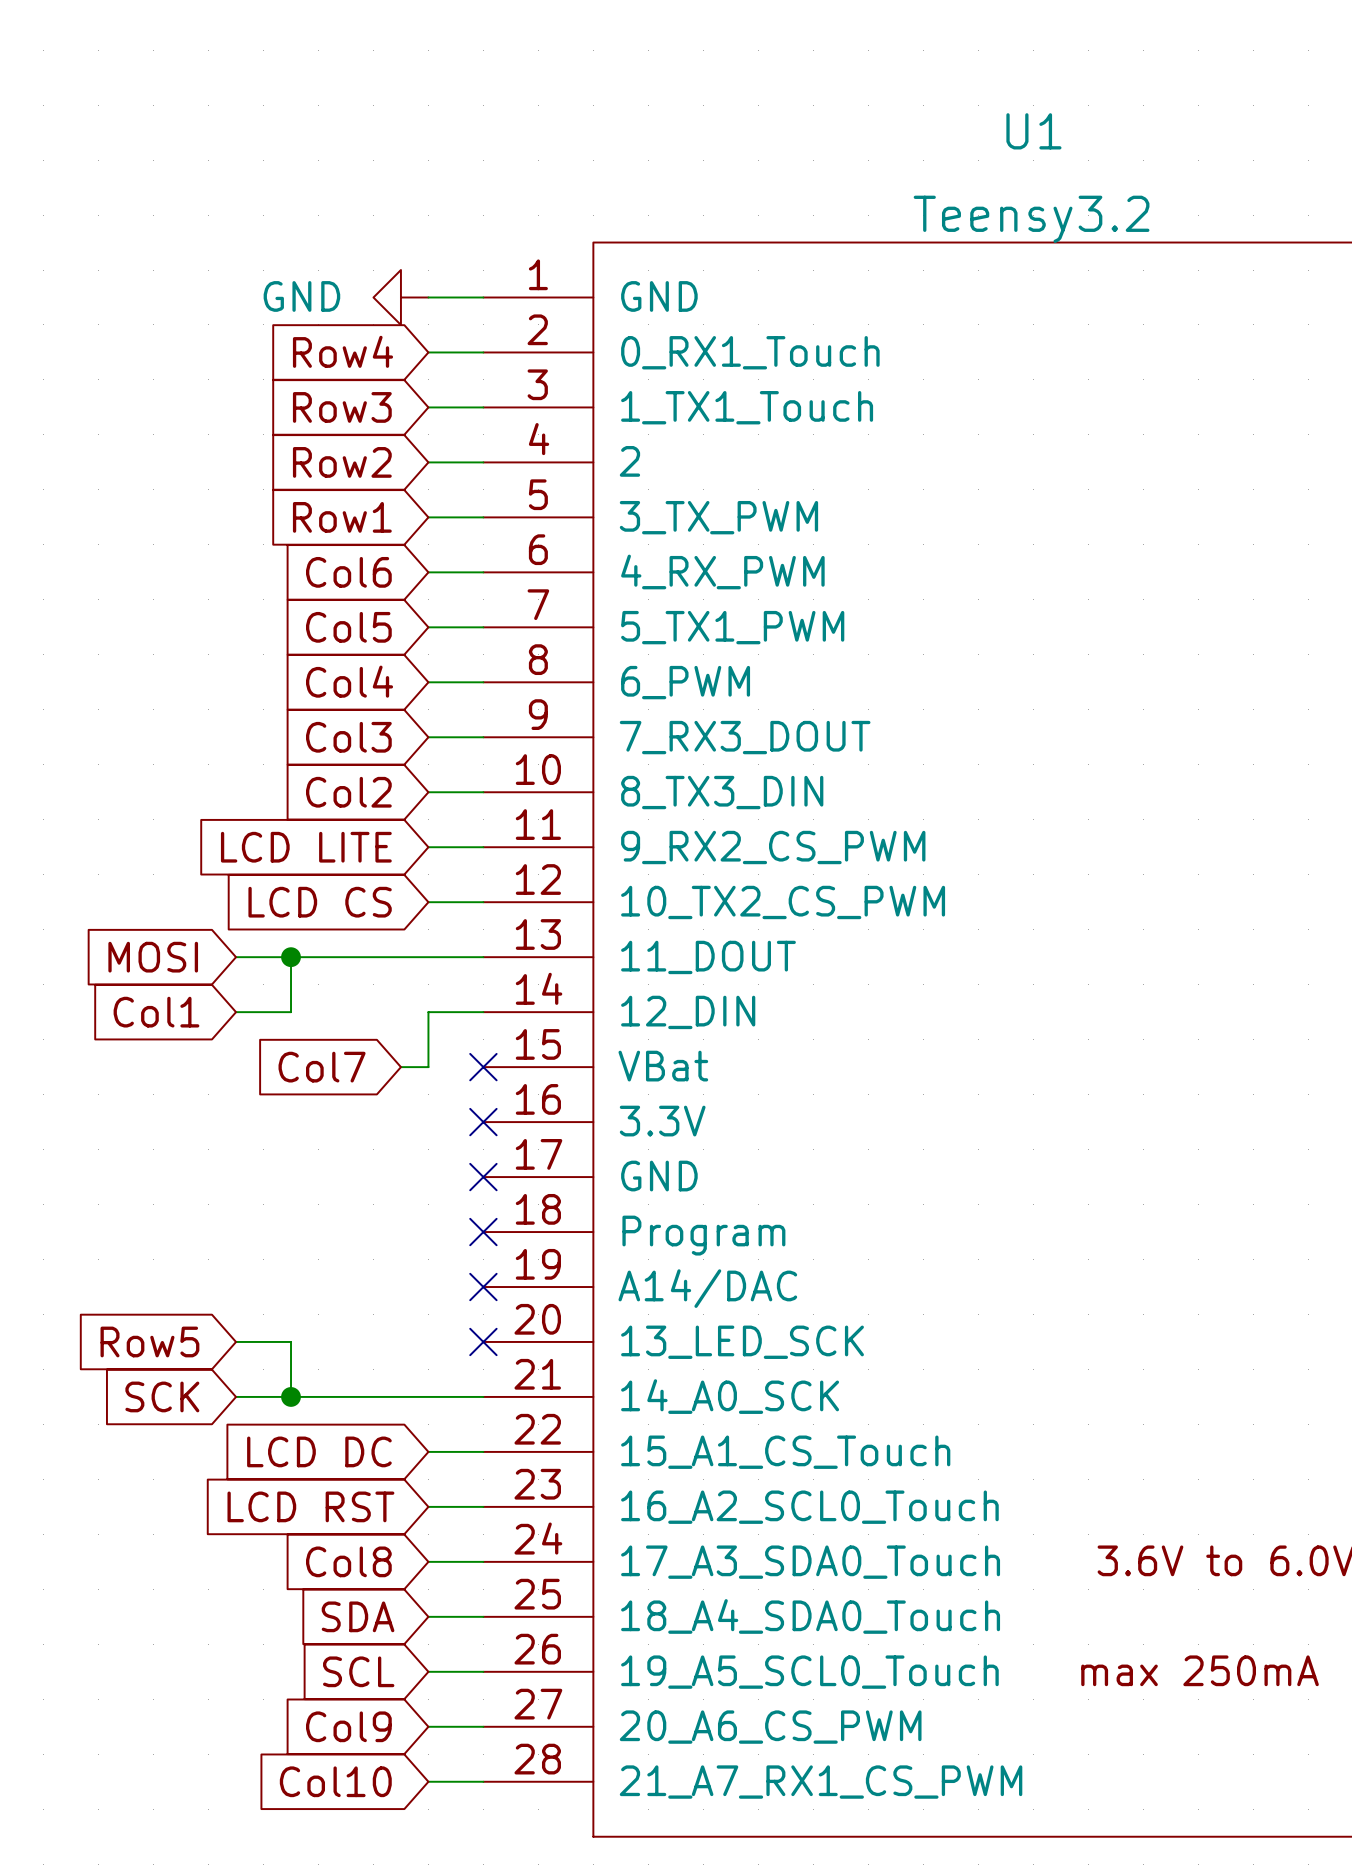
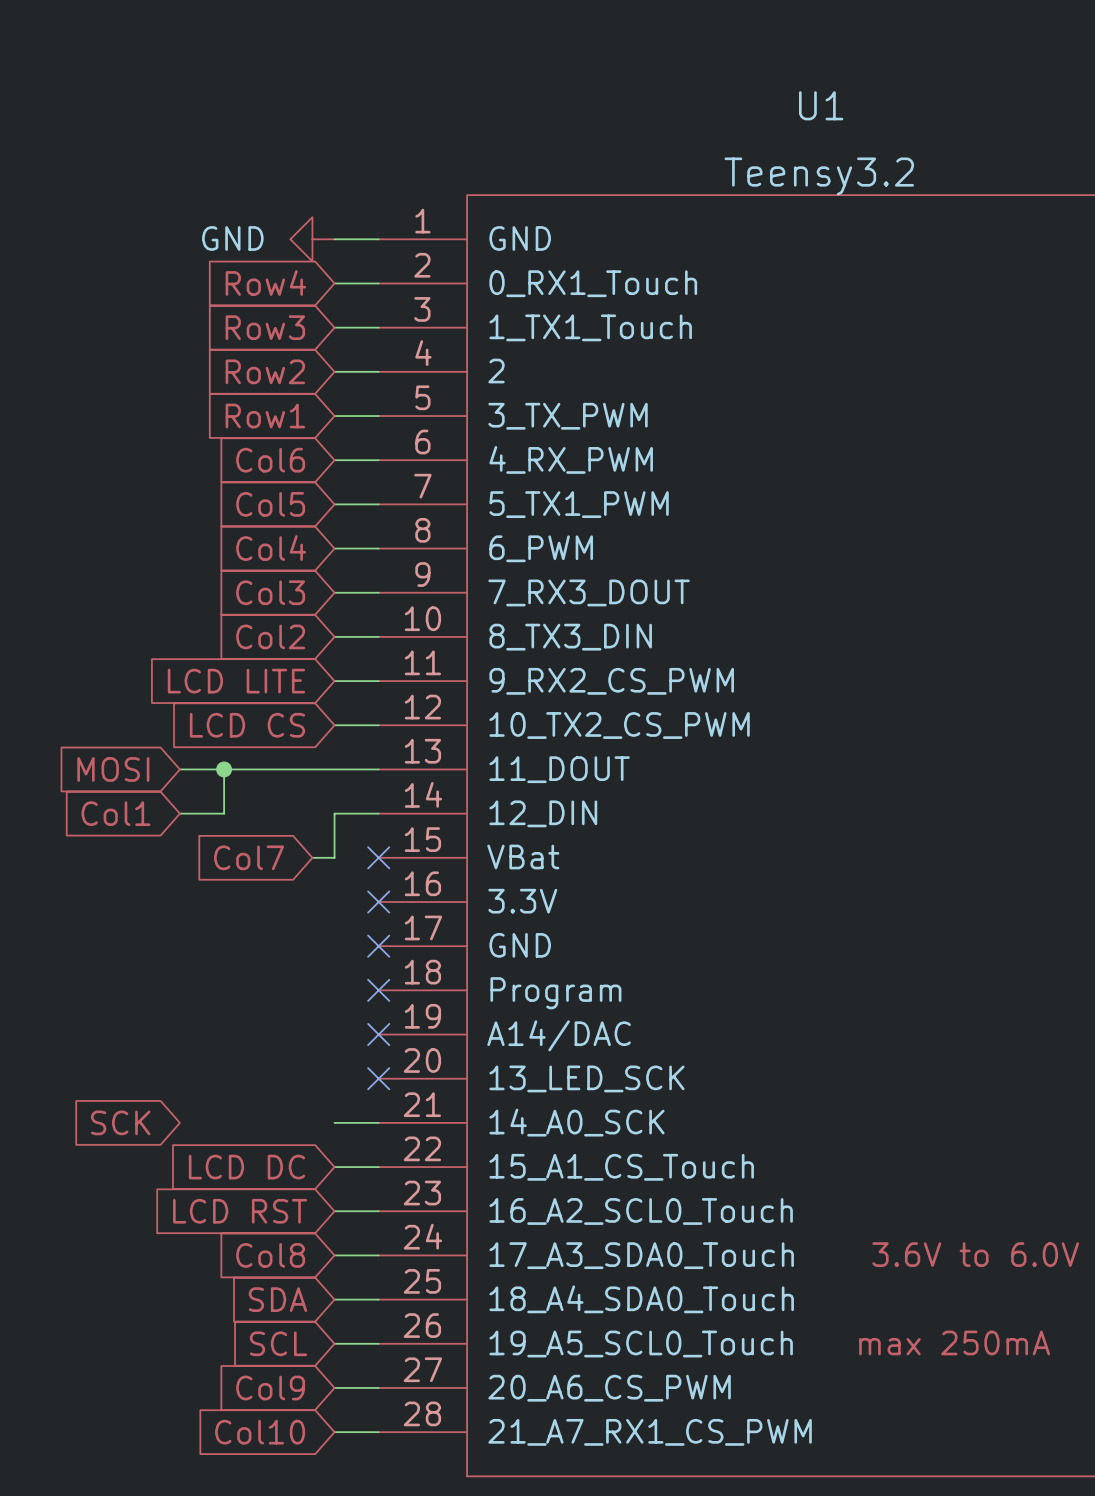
global label: Row5 (149, 1341) -> none
wire: (236, 1341) (291, 1341) (291, 1396) -> none
wire: (236, 1396) (428, 1396) -> none
junction: (291, 1396) -> none

